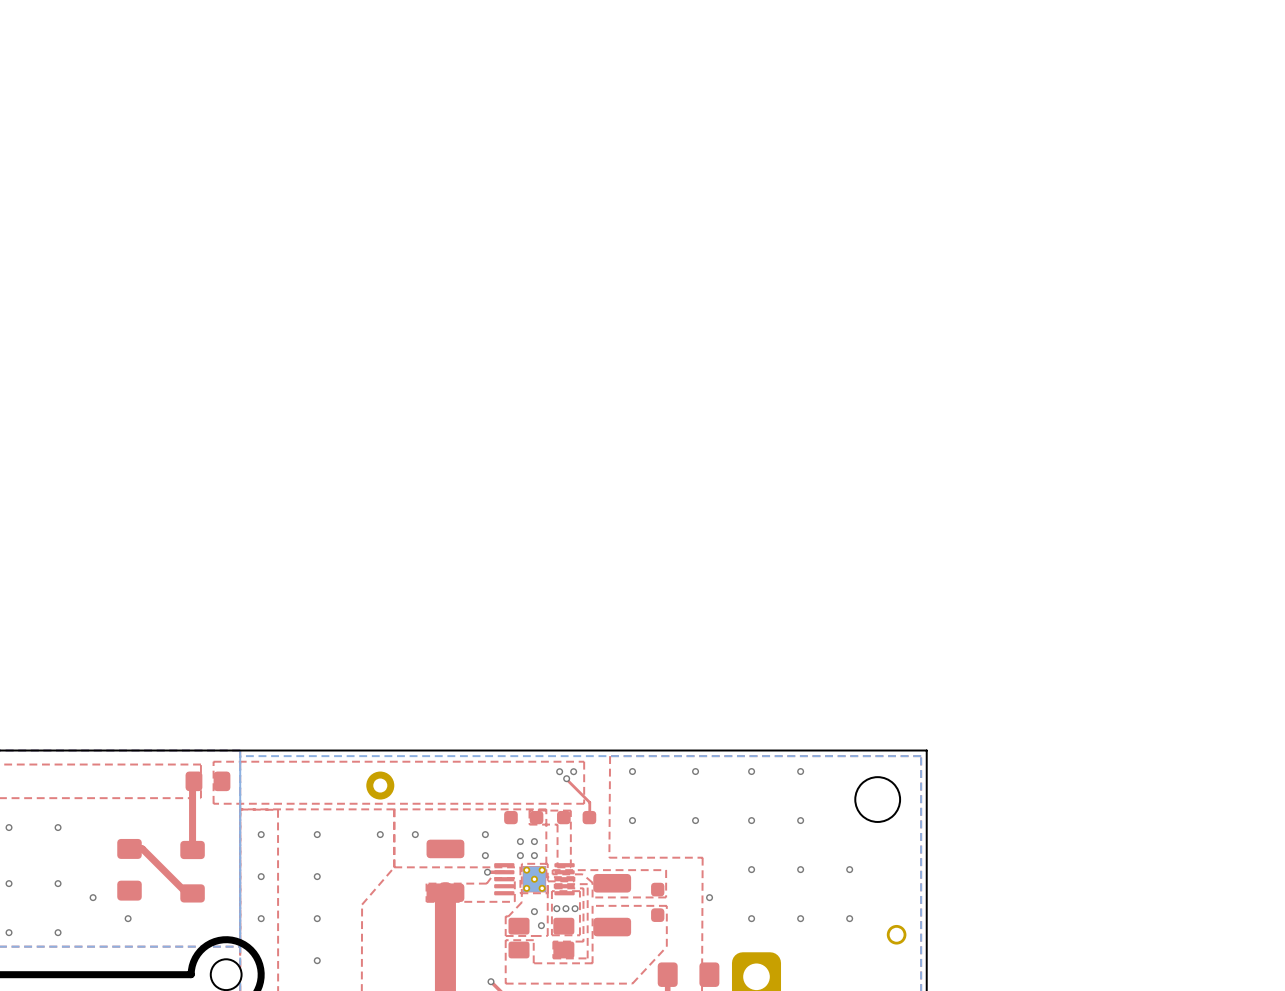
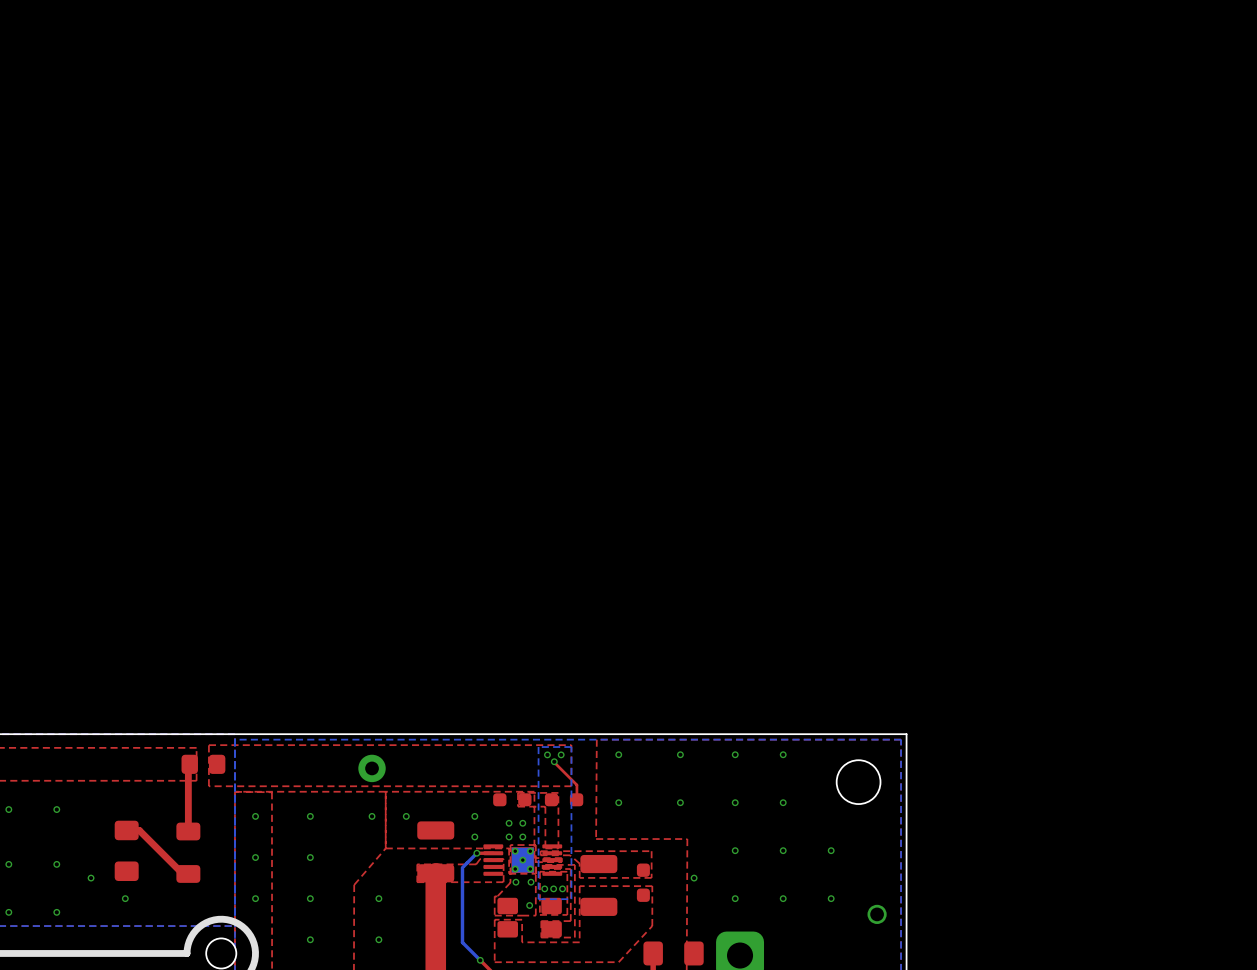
bottom zone outline: none -> (571, 747) (571, 899) (538, 899) (538, 747) (571, 747)
bottom track: none -> (476, 853) (463, 866)
bottom track: none -> (462, 867) (462, 942) (480, 960)
via: none -> (515, 882)
via: none -> (531, 882)
via: (534, 911) -> none
via: none -> (378, 898)
via: none -> (378, 939)

